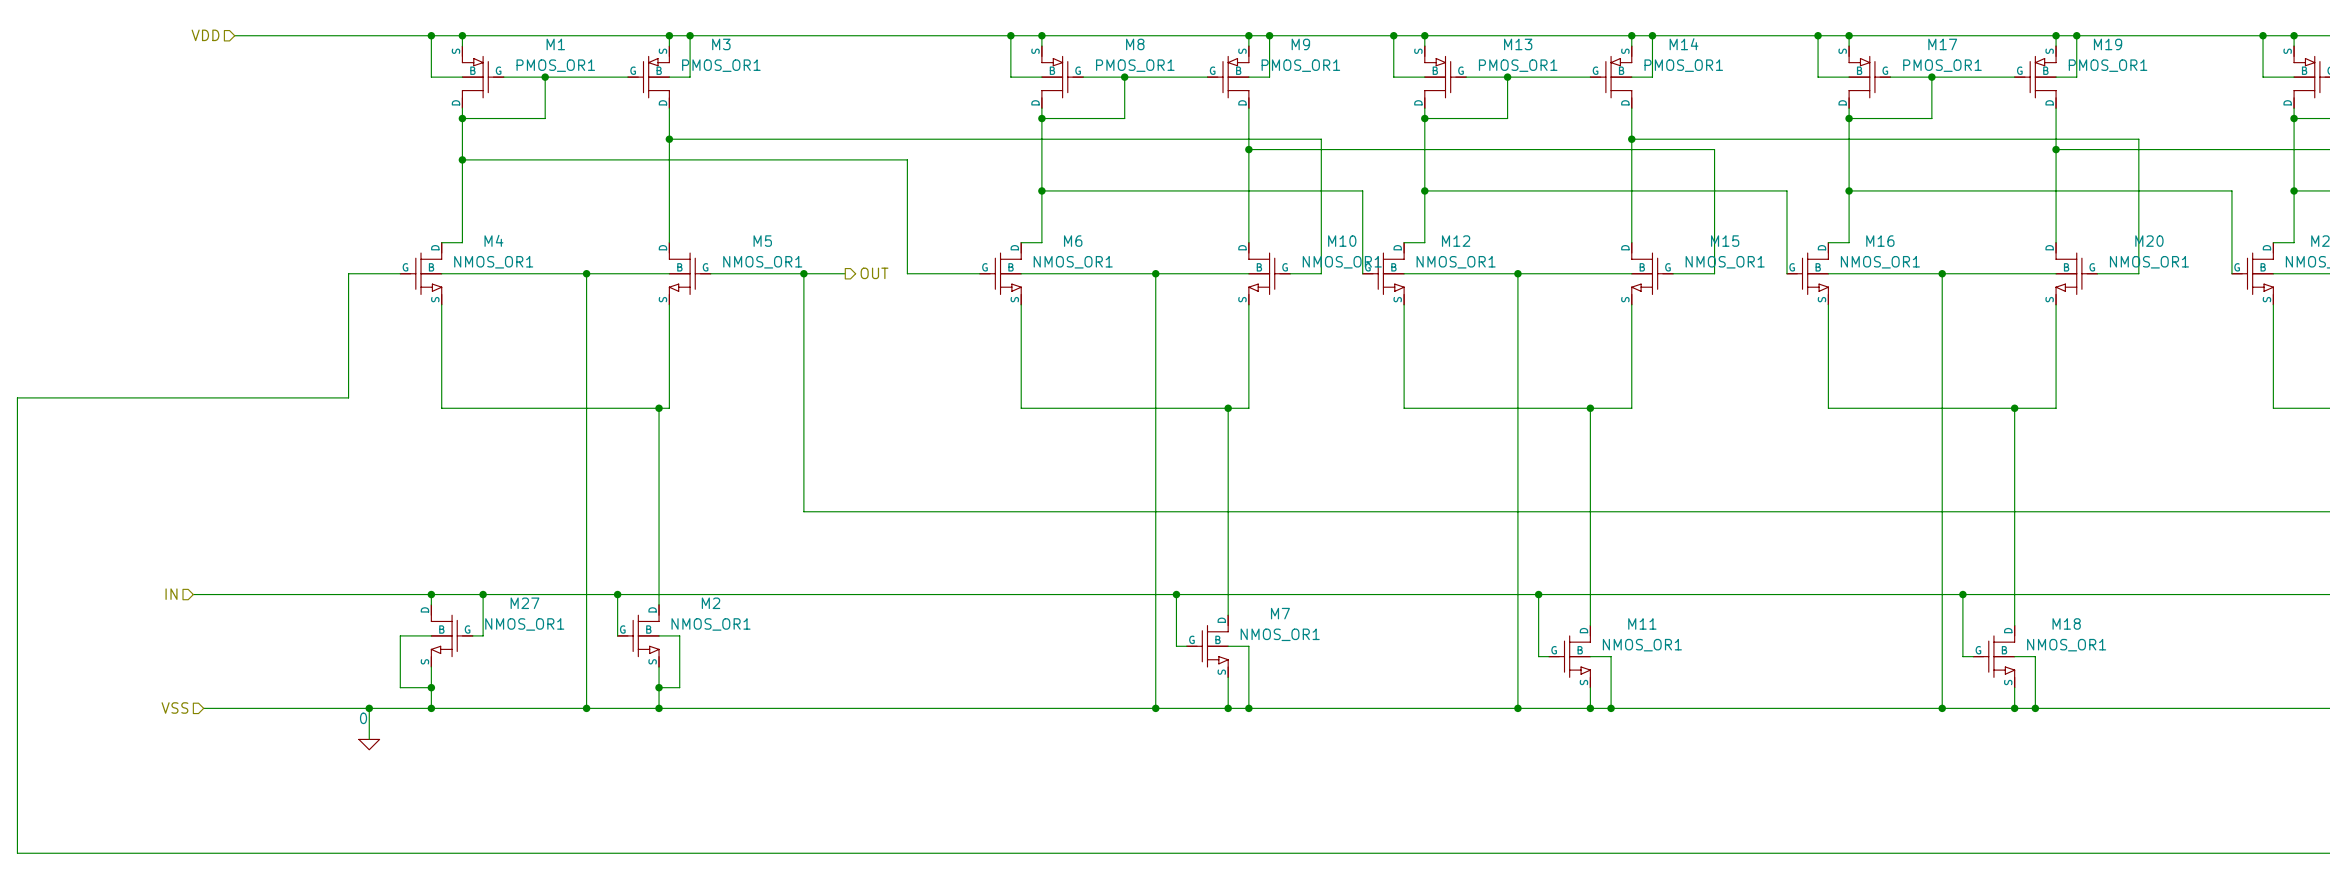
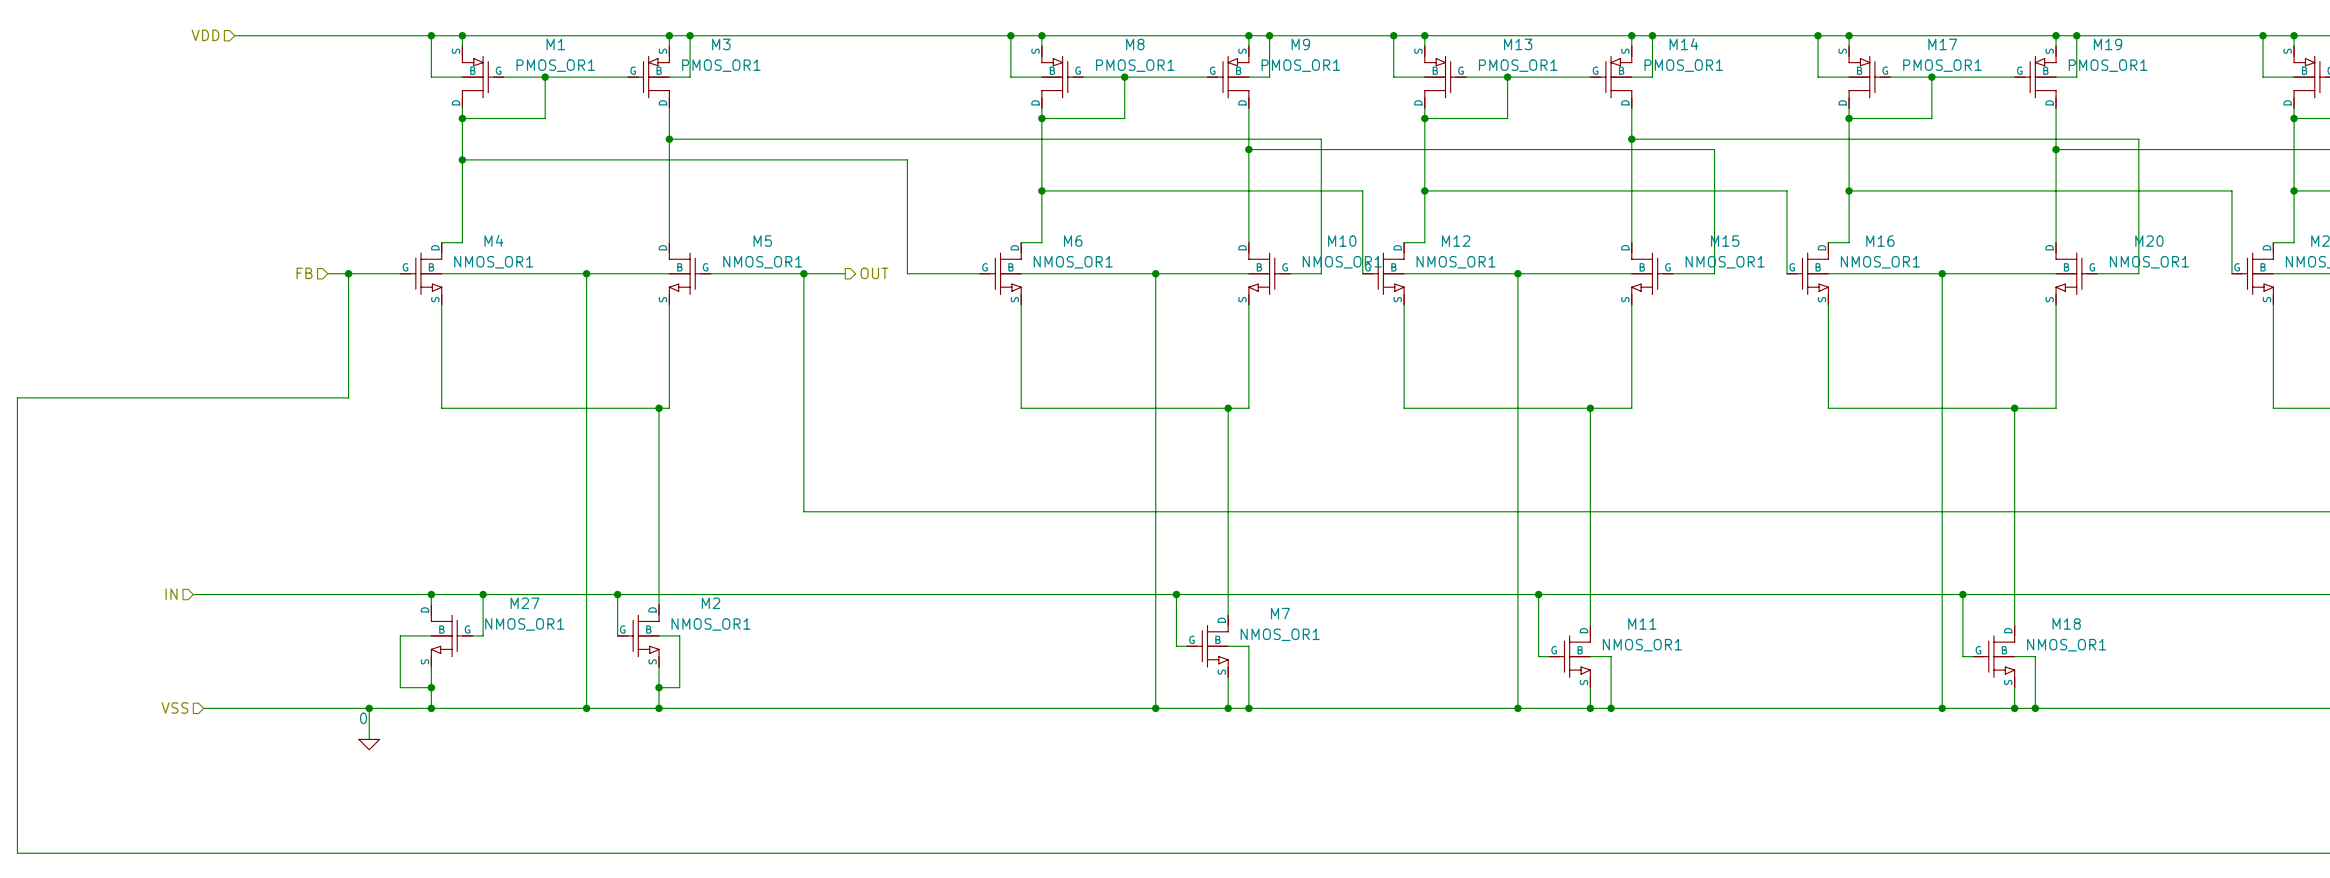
hierarchical label: none -> FB (304, 273)
wire: none -> (327, 273) (348, 273)
junction: none -> (348, 273)

